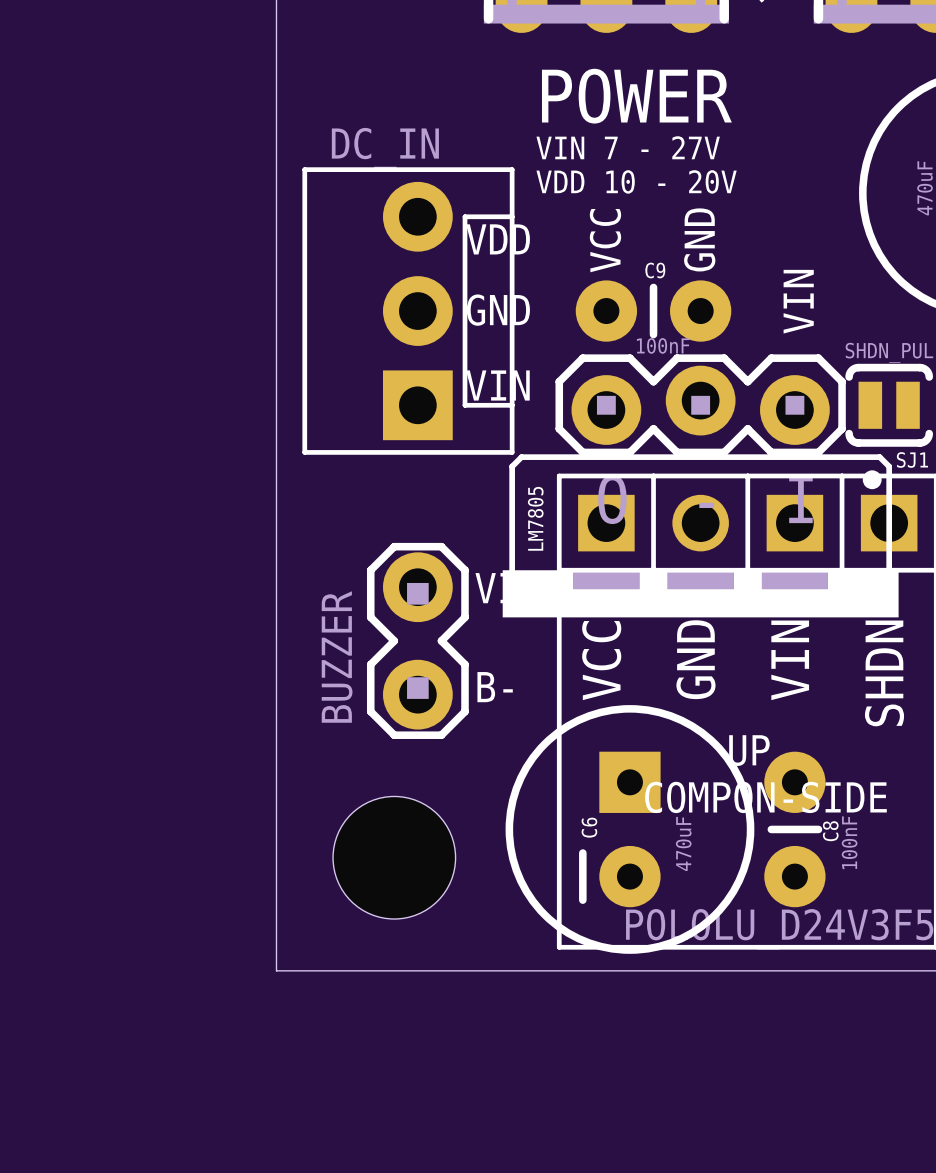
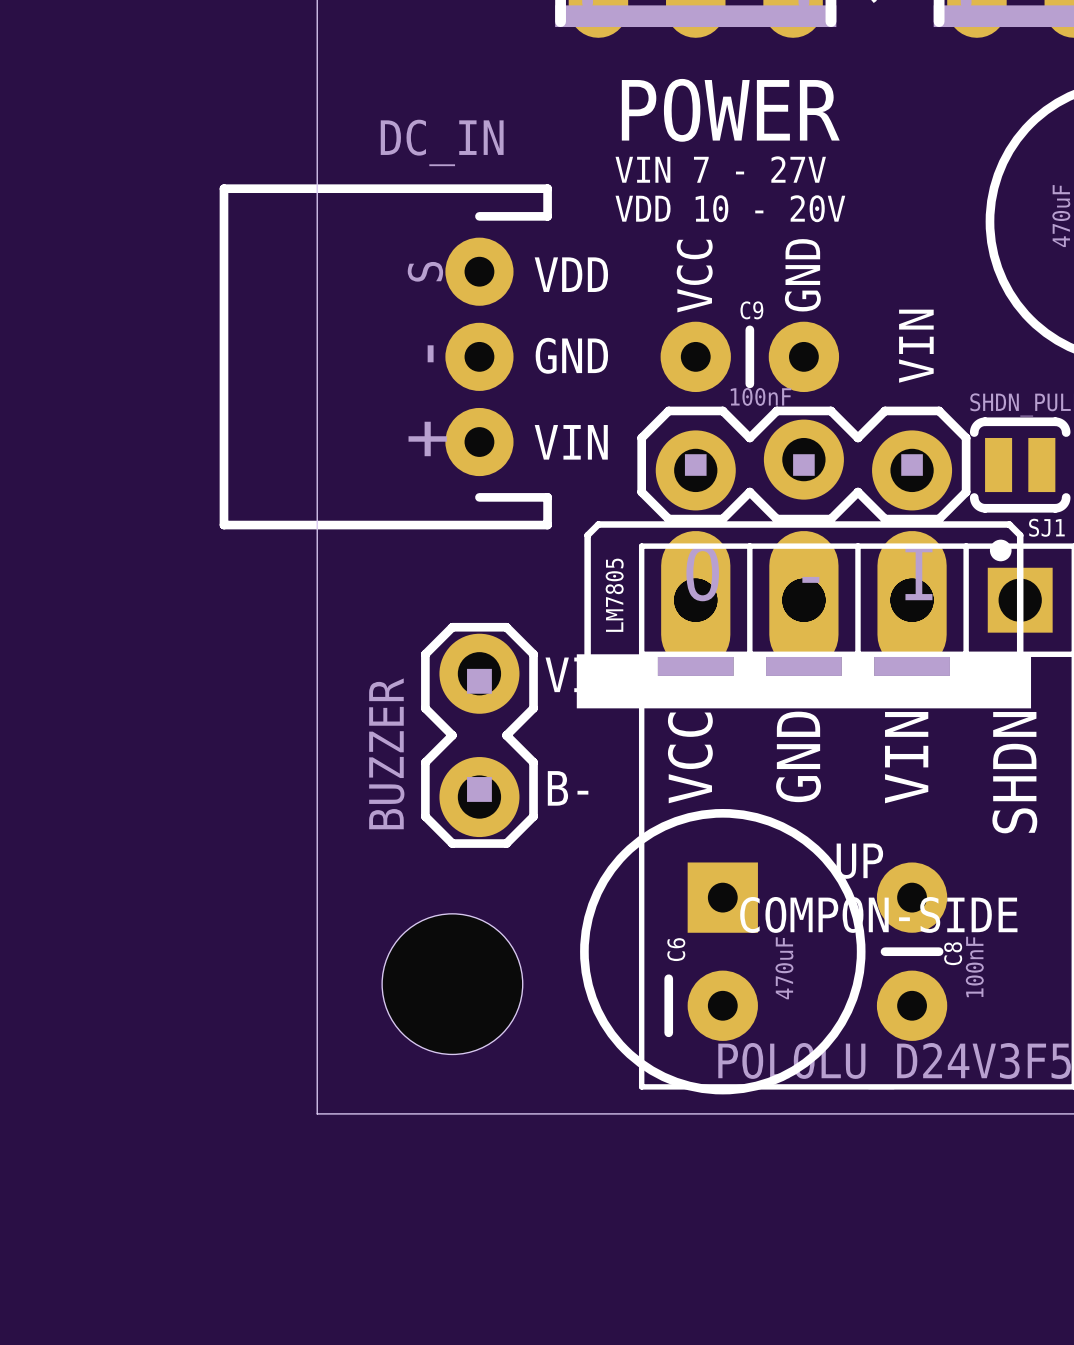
part: none -> DC_IN (385, 356)
part: DC_IN (408, 311) -> none
LM7805 footprint: [502, 454, 899, 618] -> [576, 521, 1032, 709]

